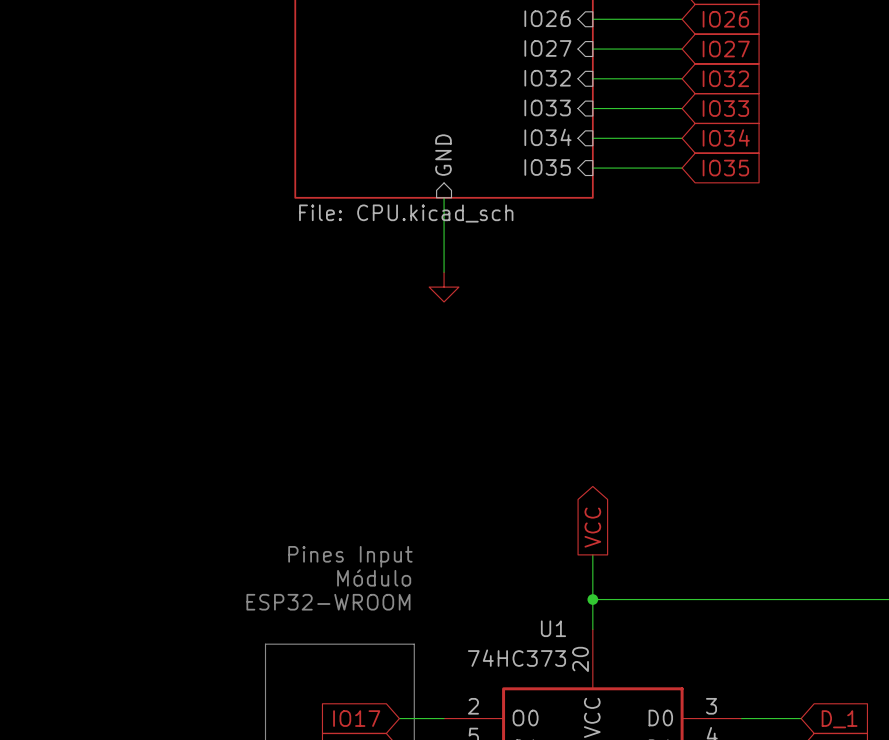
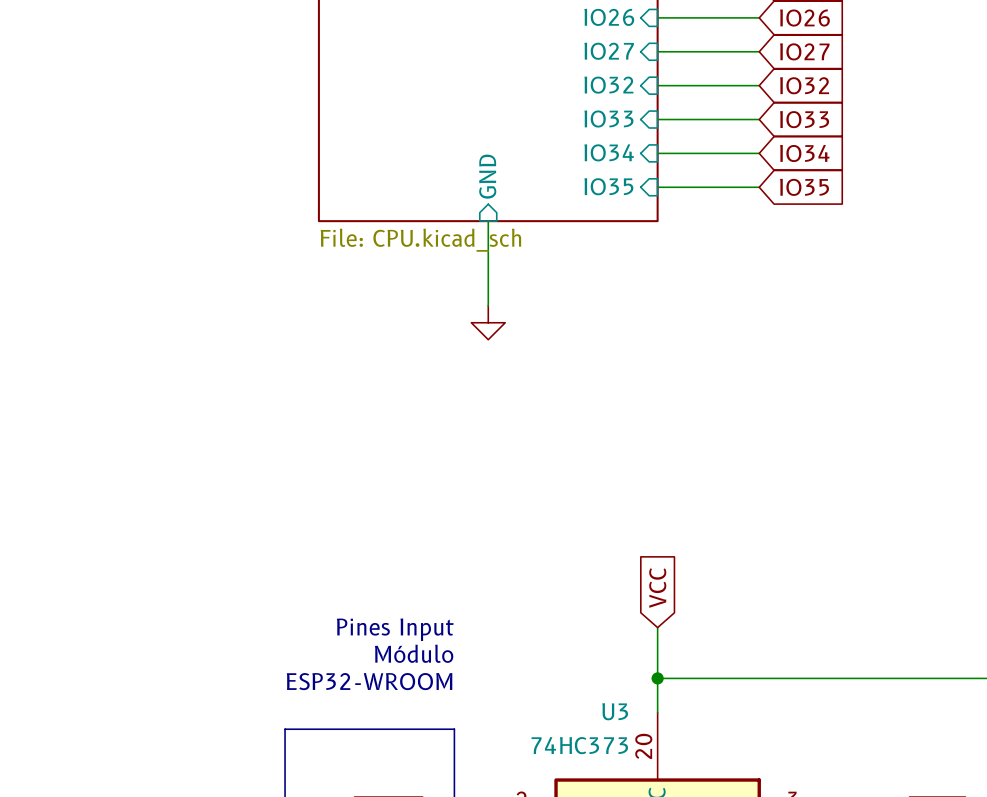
global label shape: output (592, 527) -> input (657, 587)
U1 name: U1 (553, 628) -> U3 (615, 711)

